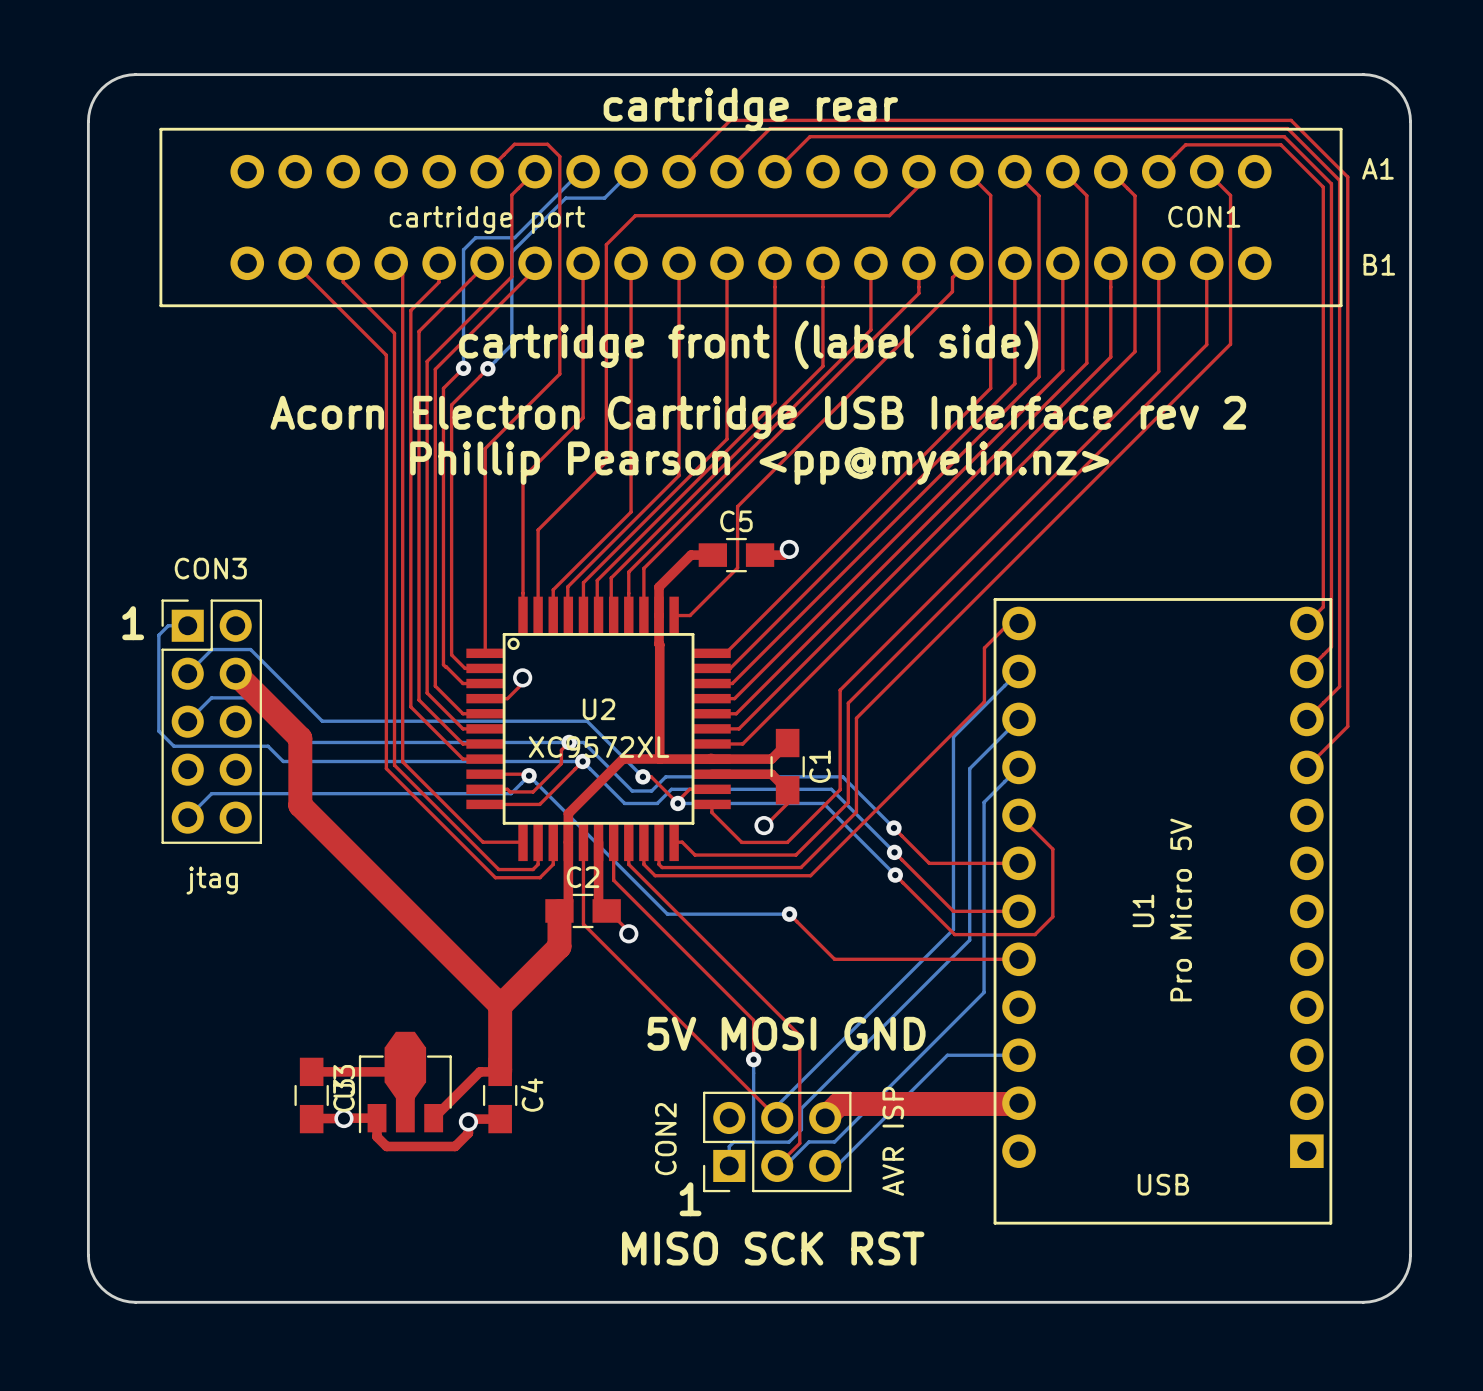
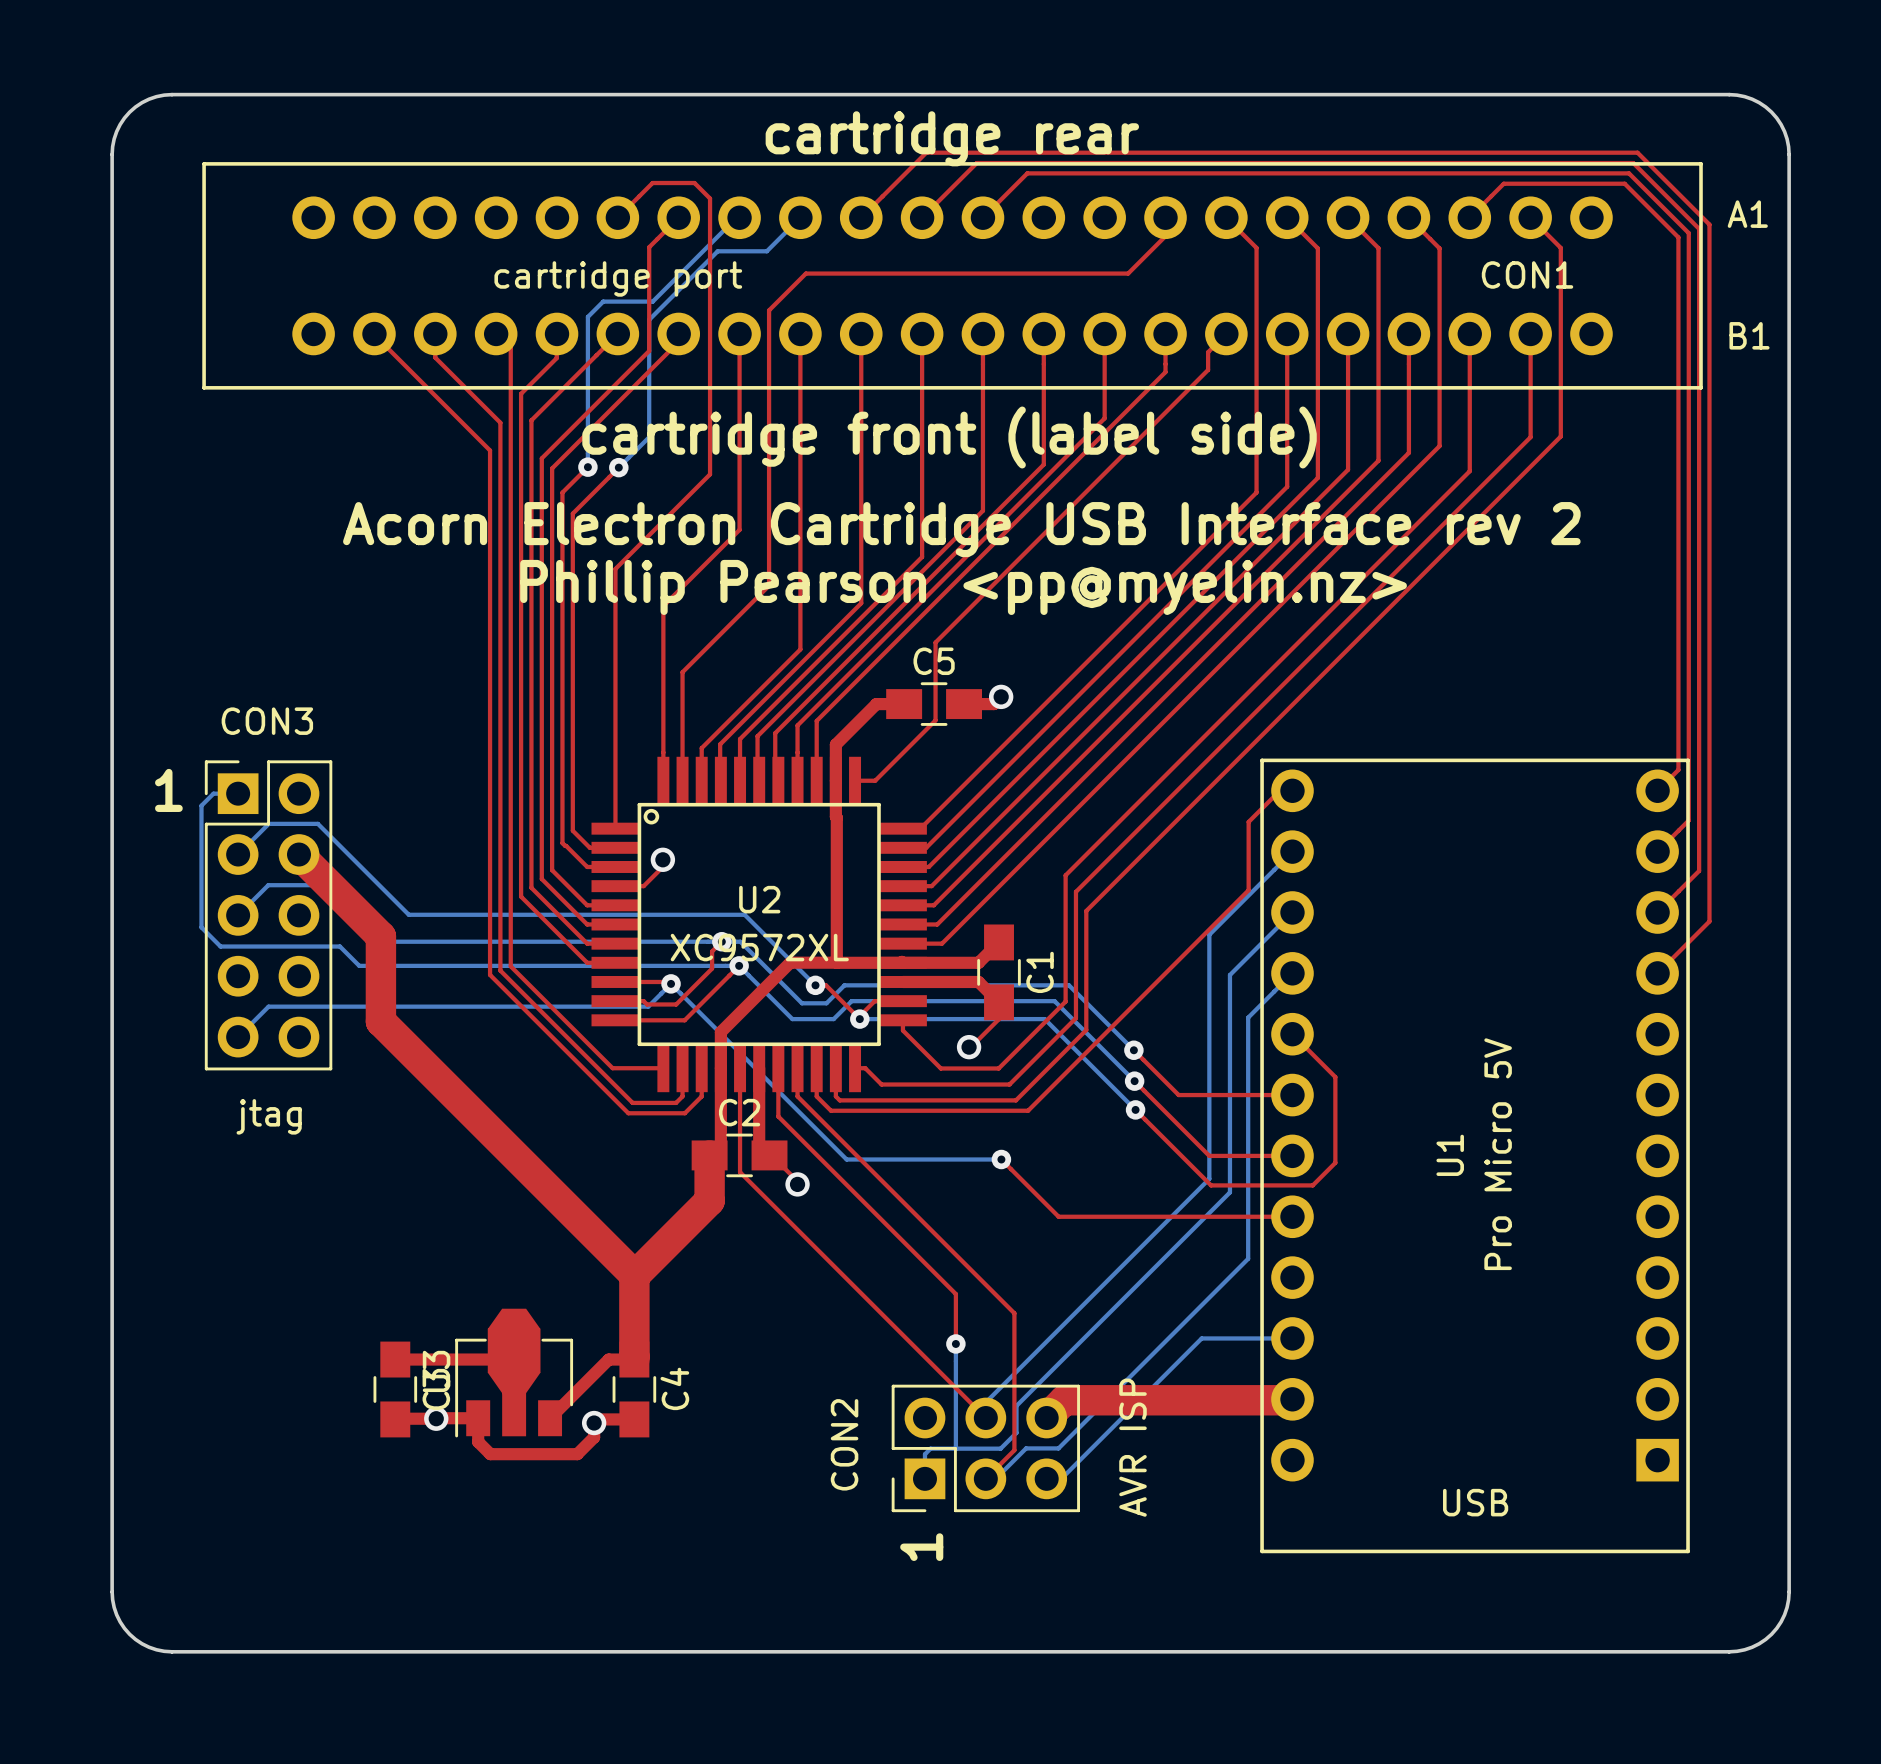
text: 5V MOSI GND (786, 1033) -> none
text rotation: 0° (690, 1199) -> 90° counterclockwise (921, 1547)
text: MISO SCK RST (773, 1248) -> none

